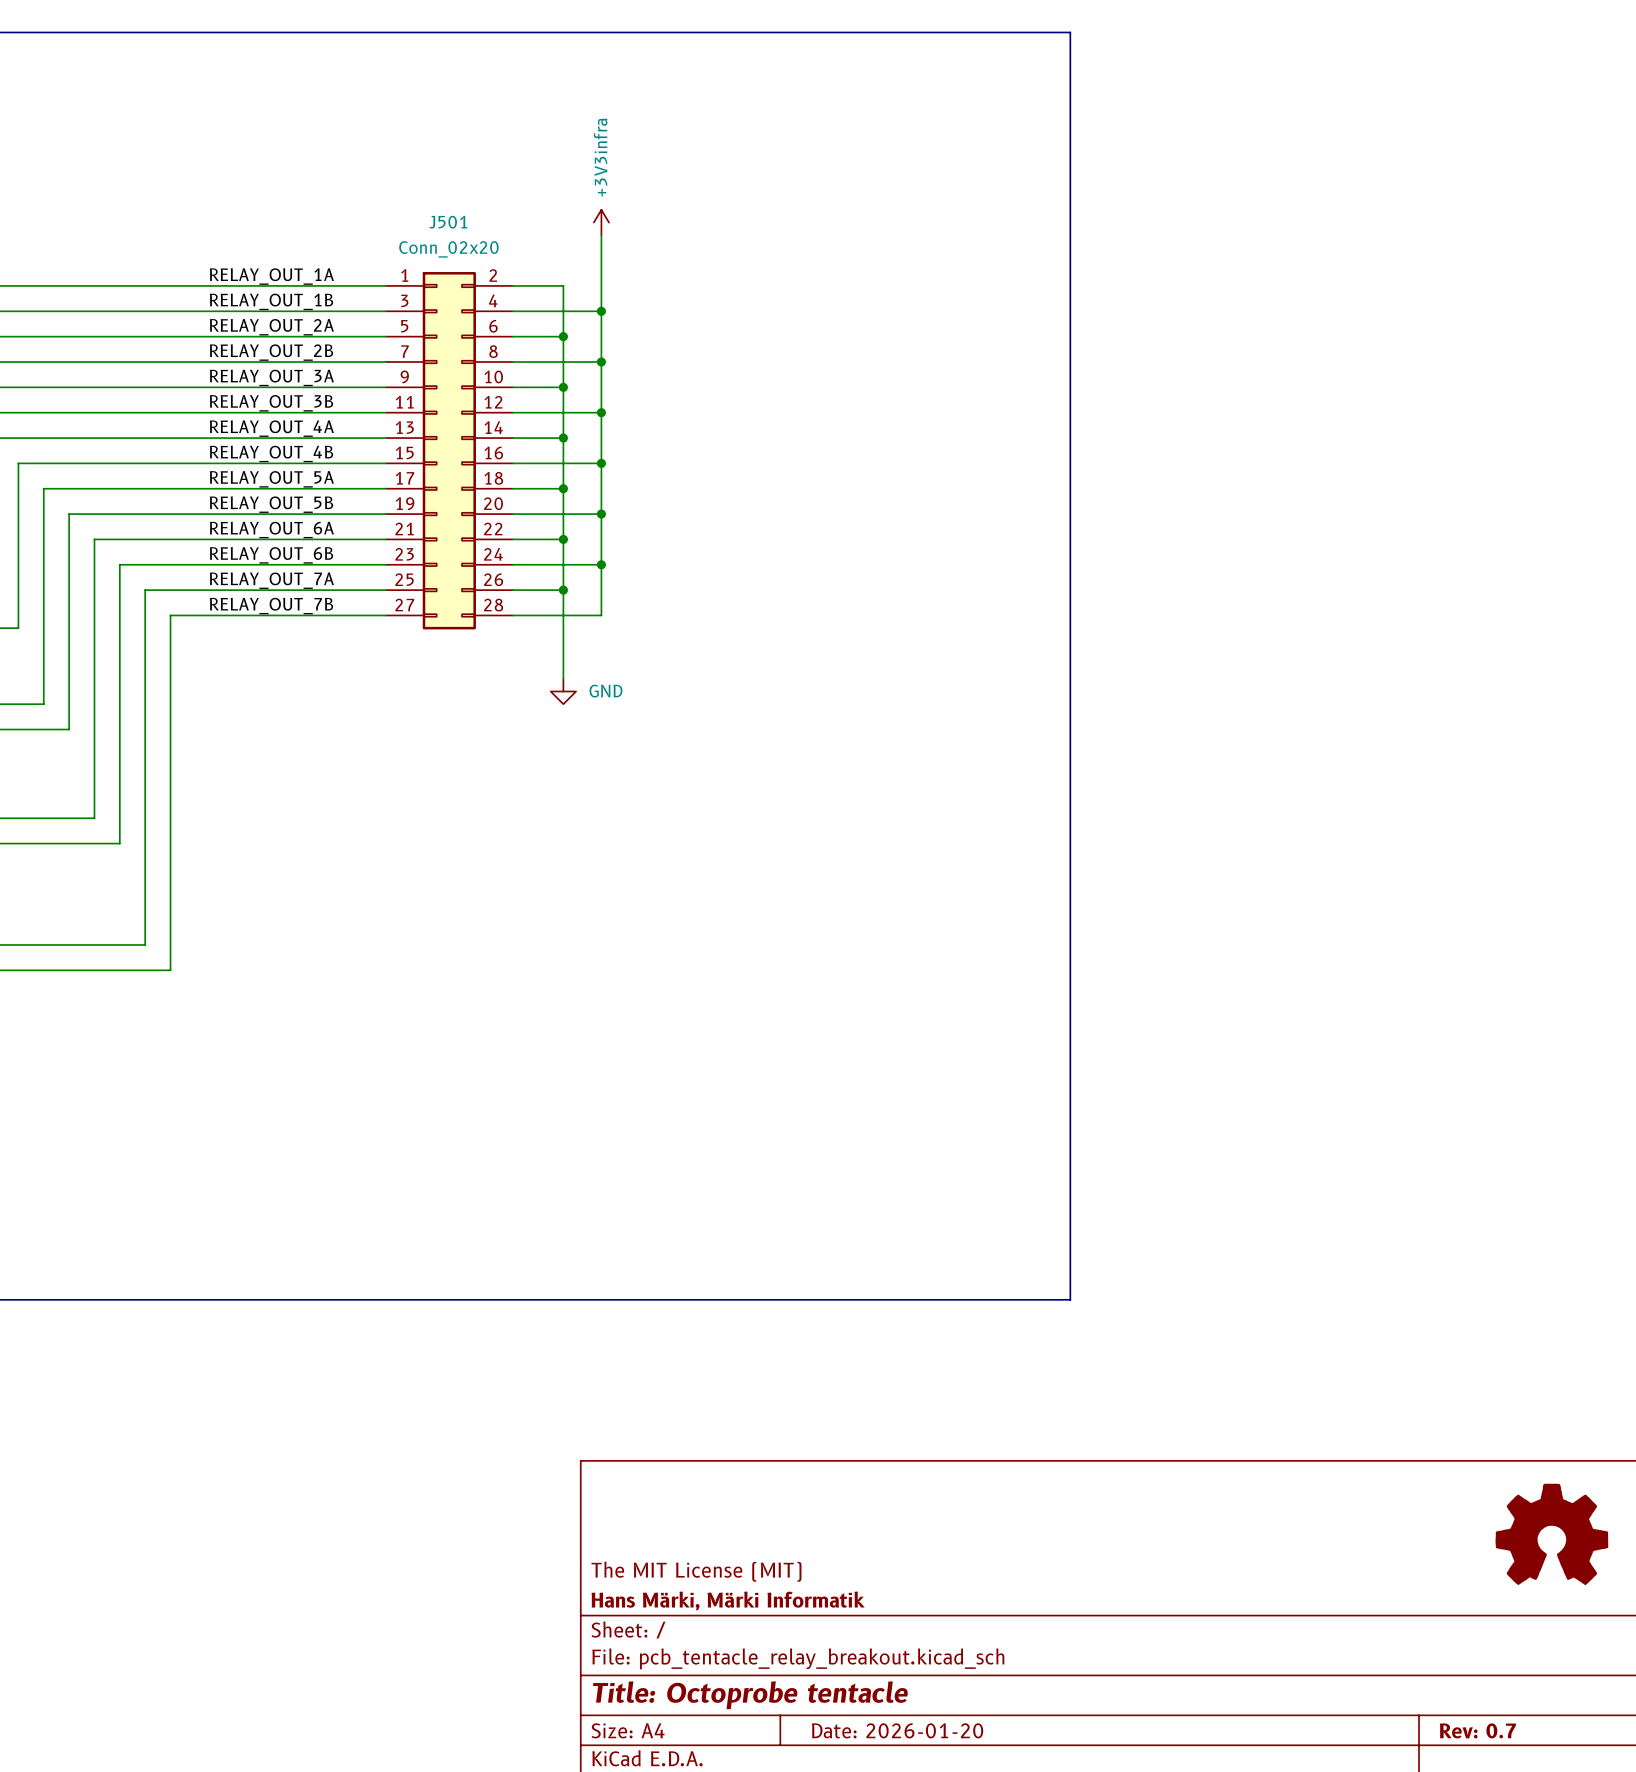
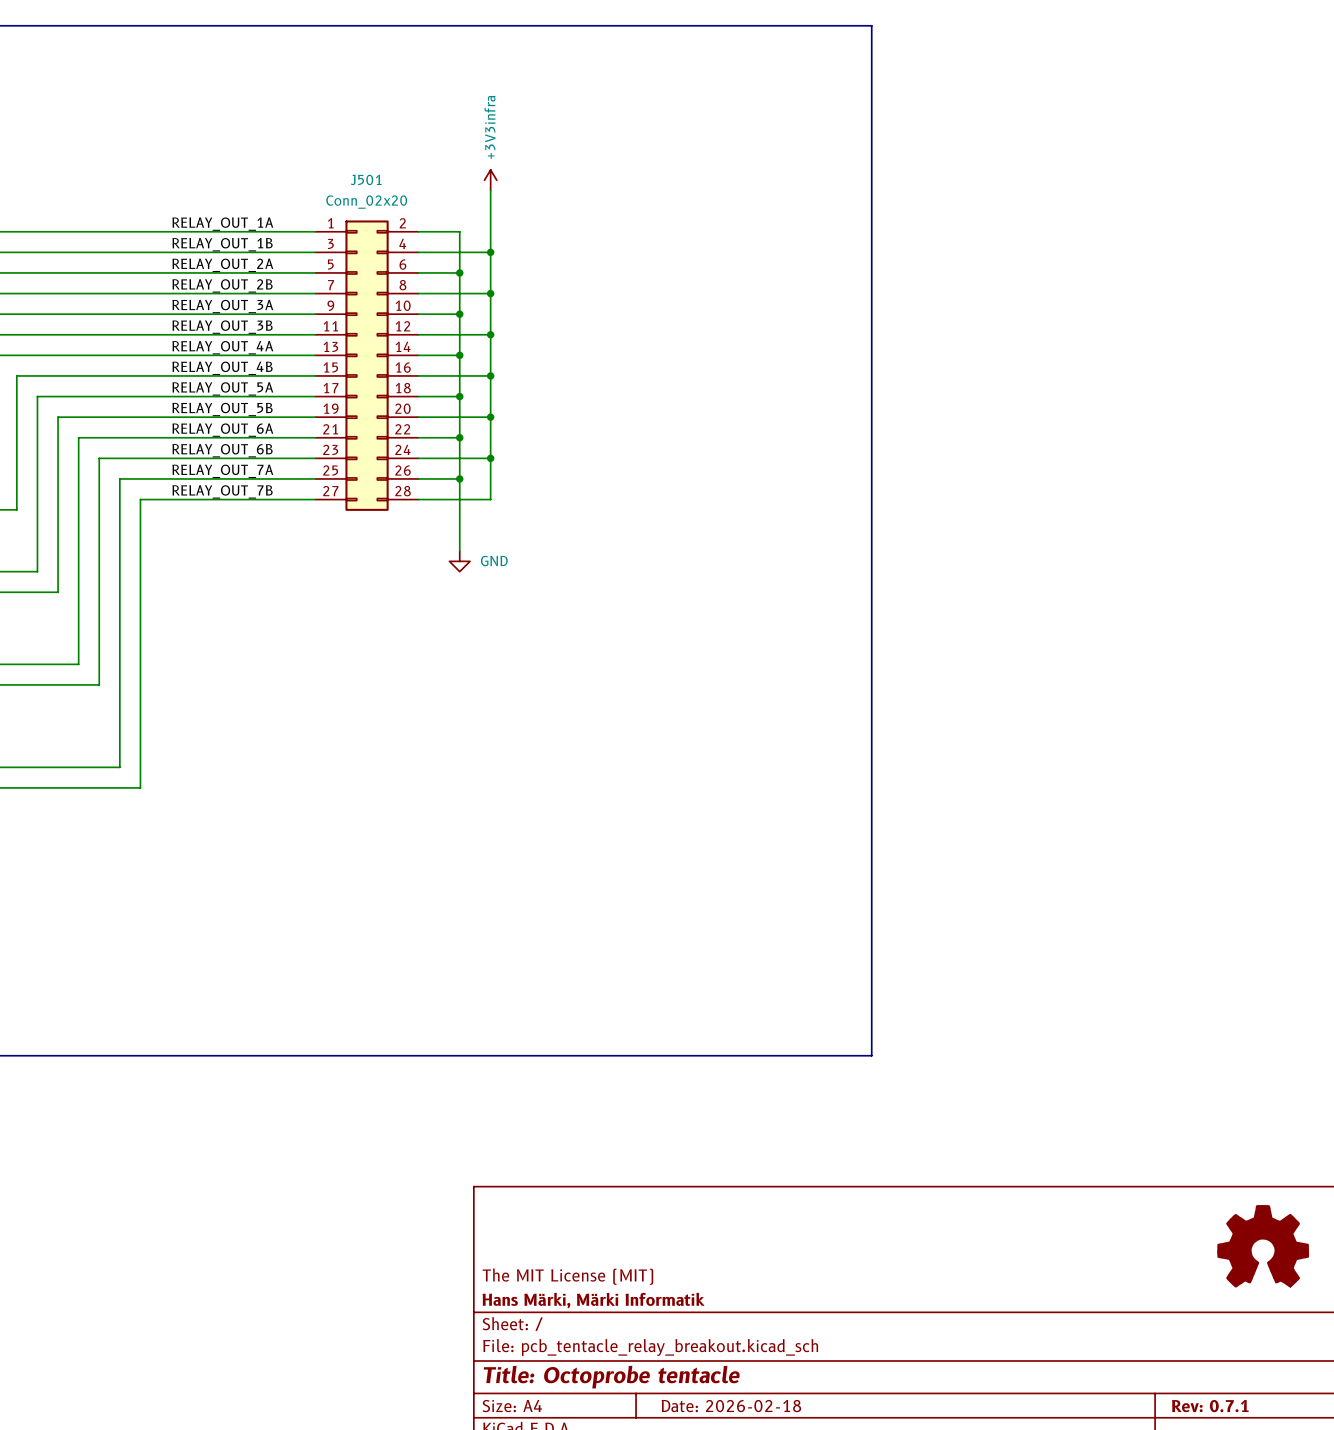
title block: Date: 2026-01-20 (897, 1730) -> Date: 2026-02-18 (731, 1406)
title block: Rev: 0.7 (1477, 1730) -> Rev: 0.7.1 (1210, 1406)

